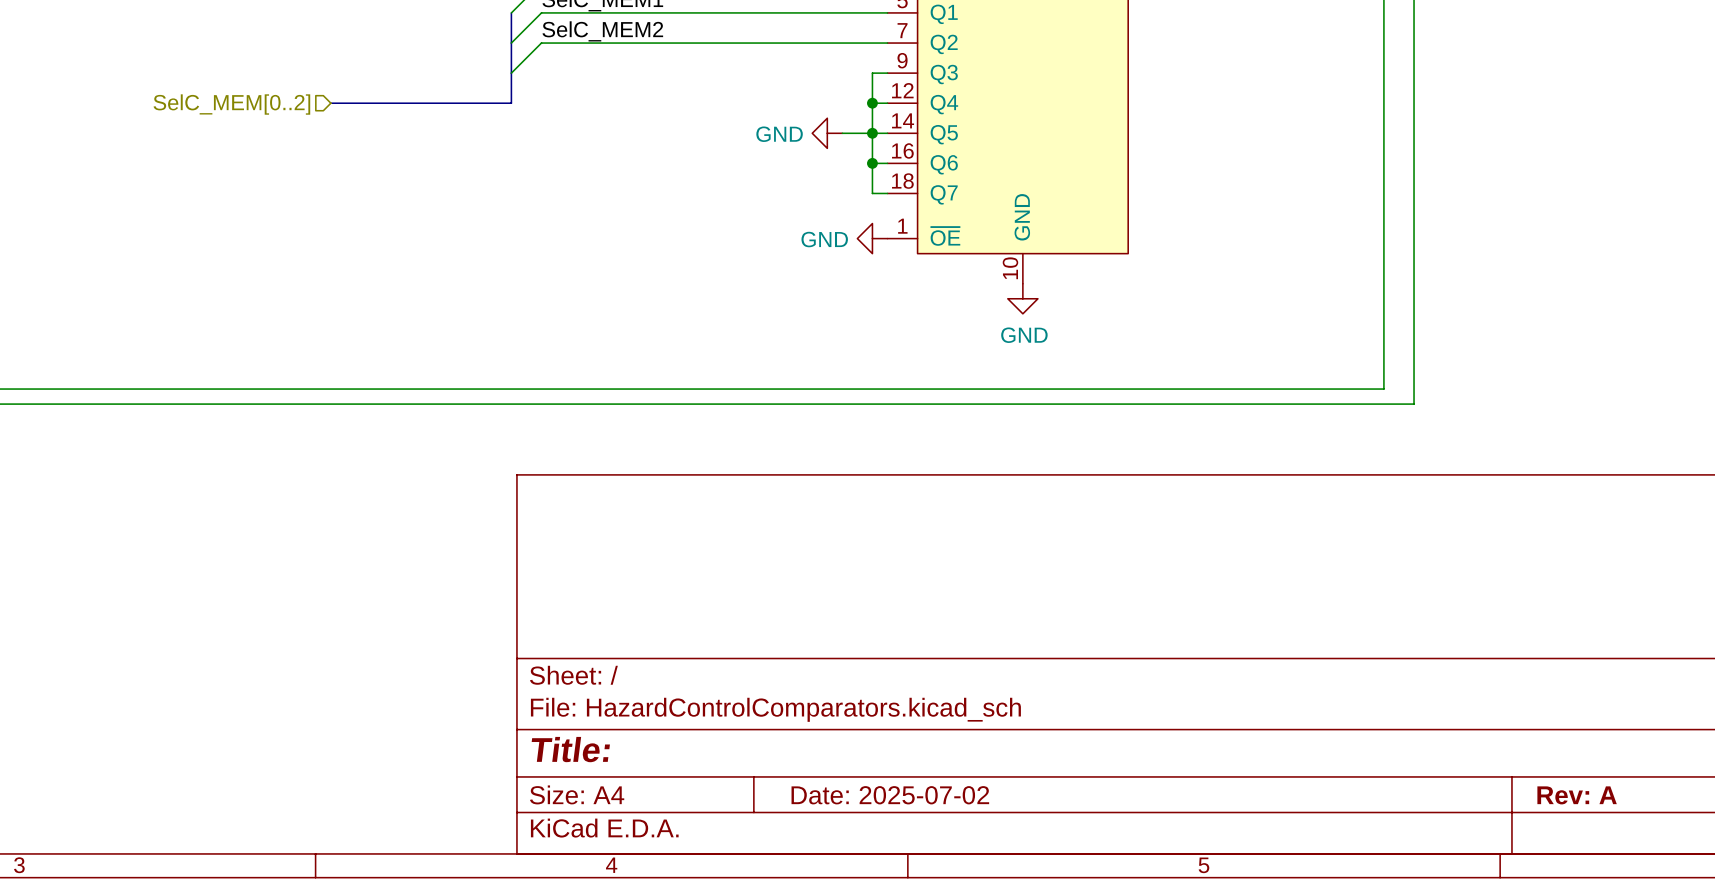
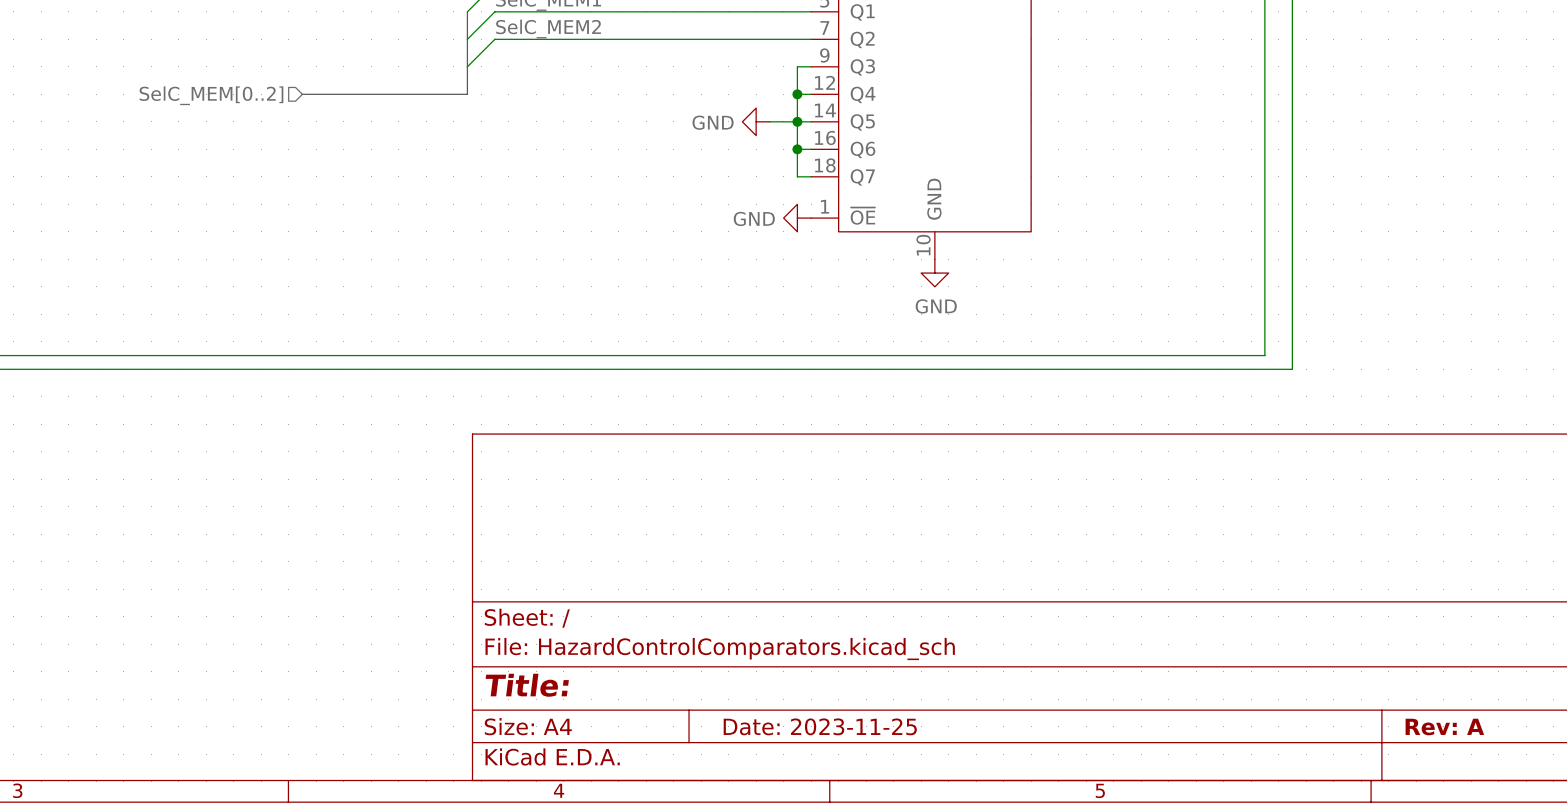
title block: Date: 2025-07-02 (890, 795) -> Date: 2023-11-25 (820, 726)

